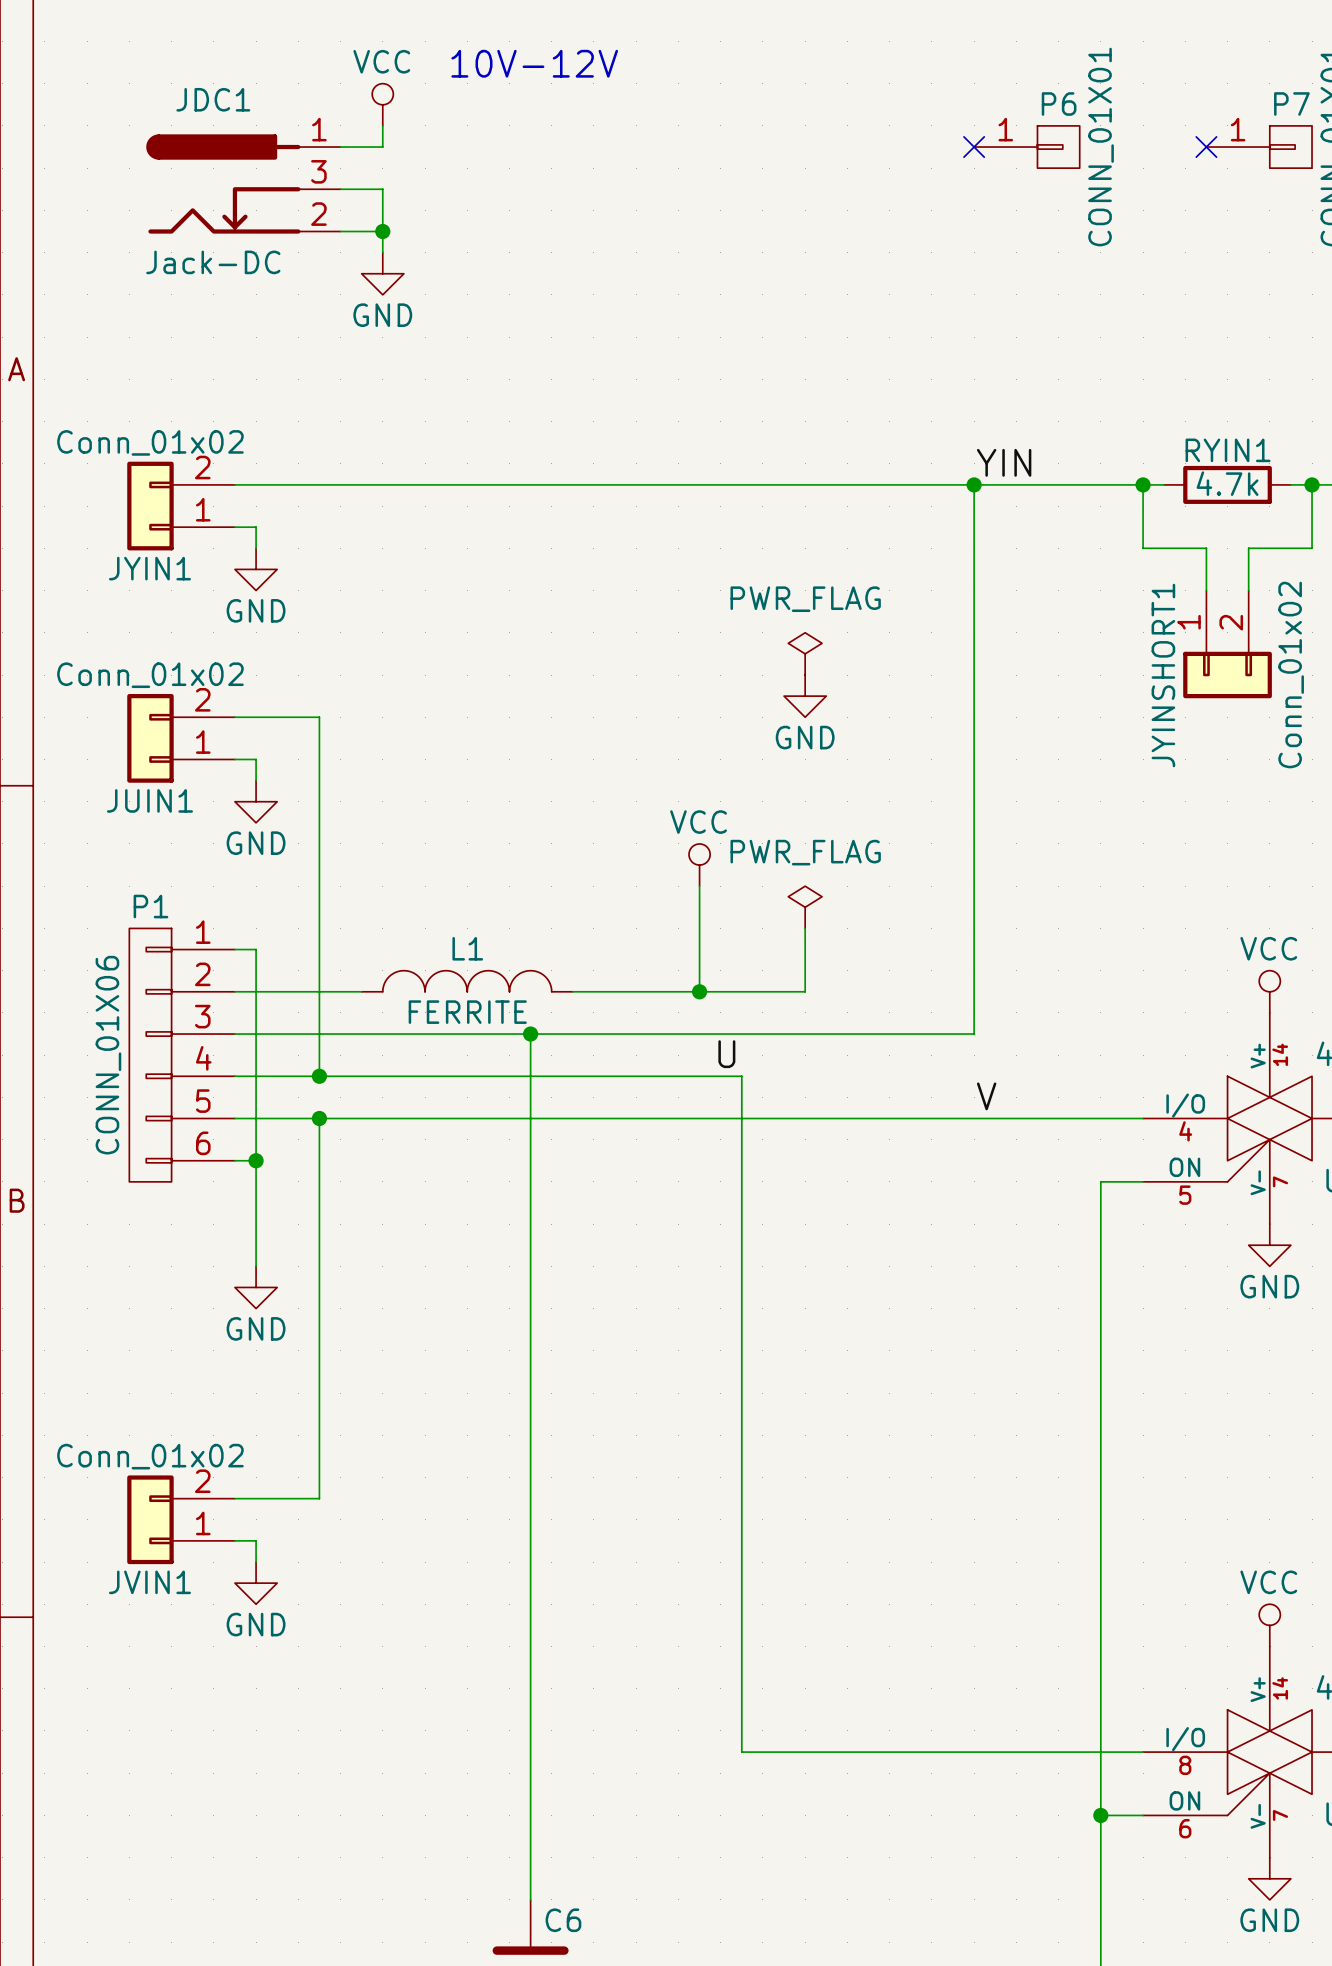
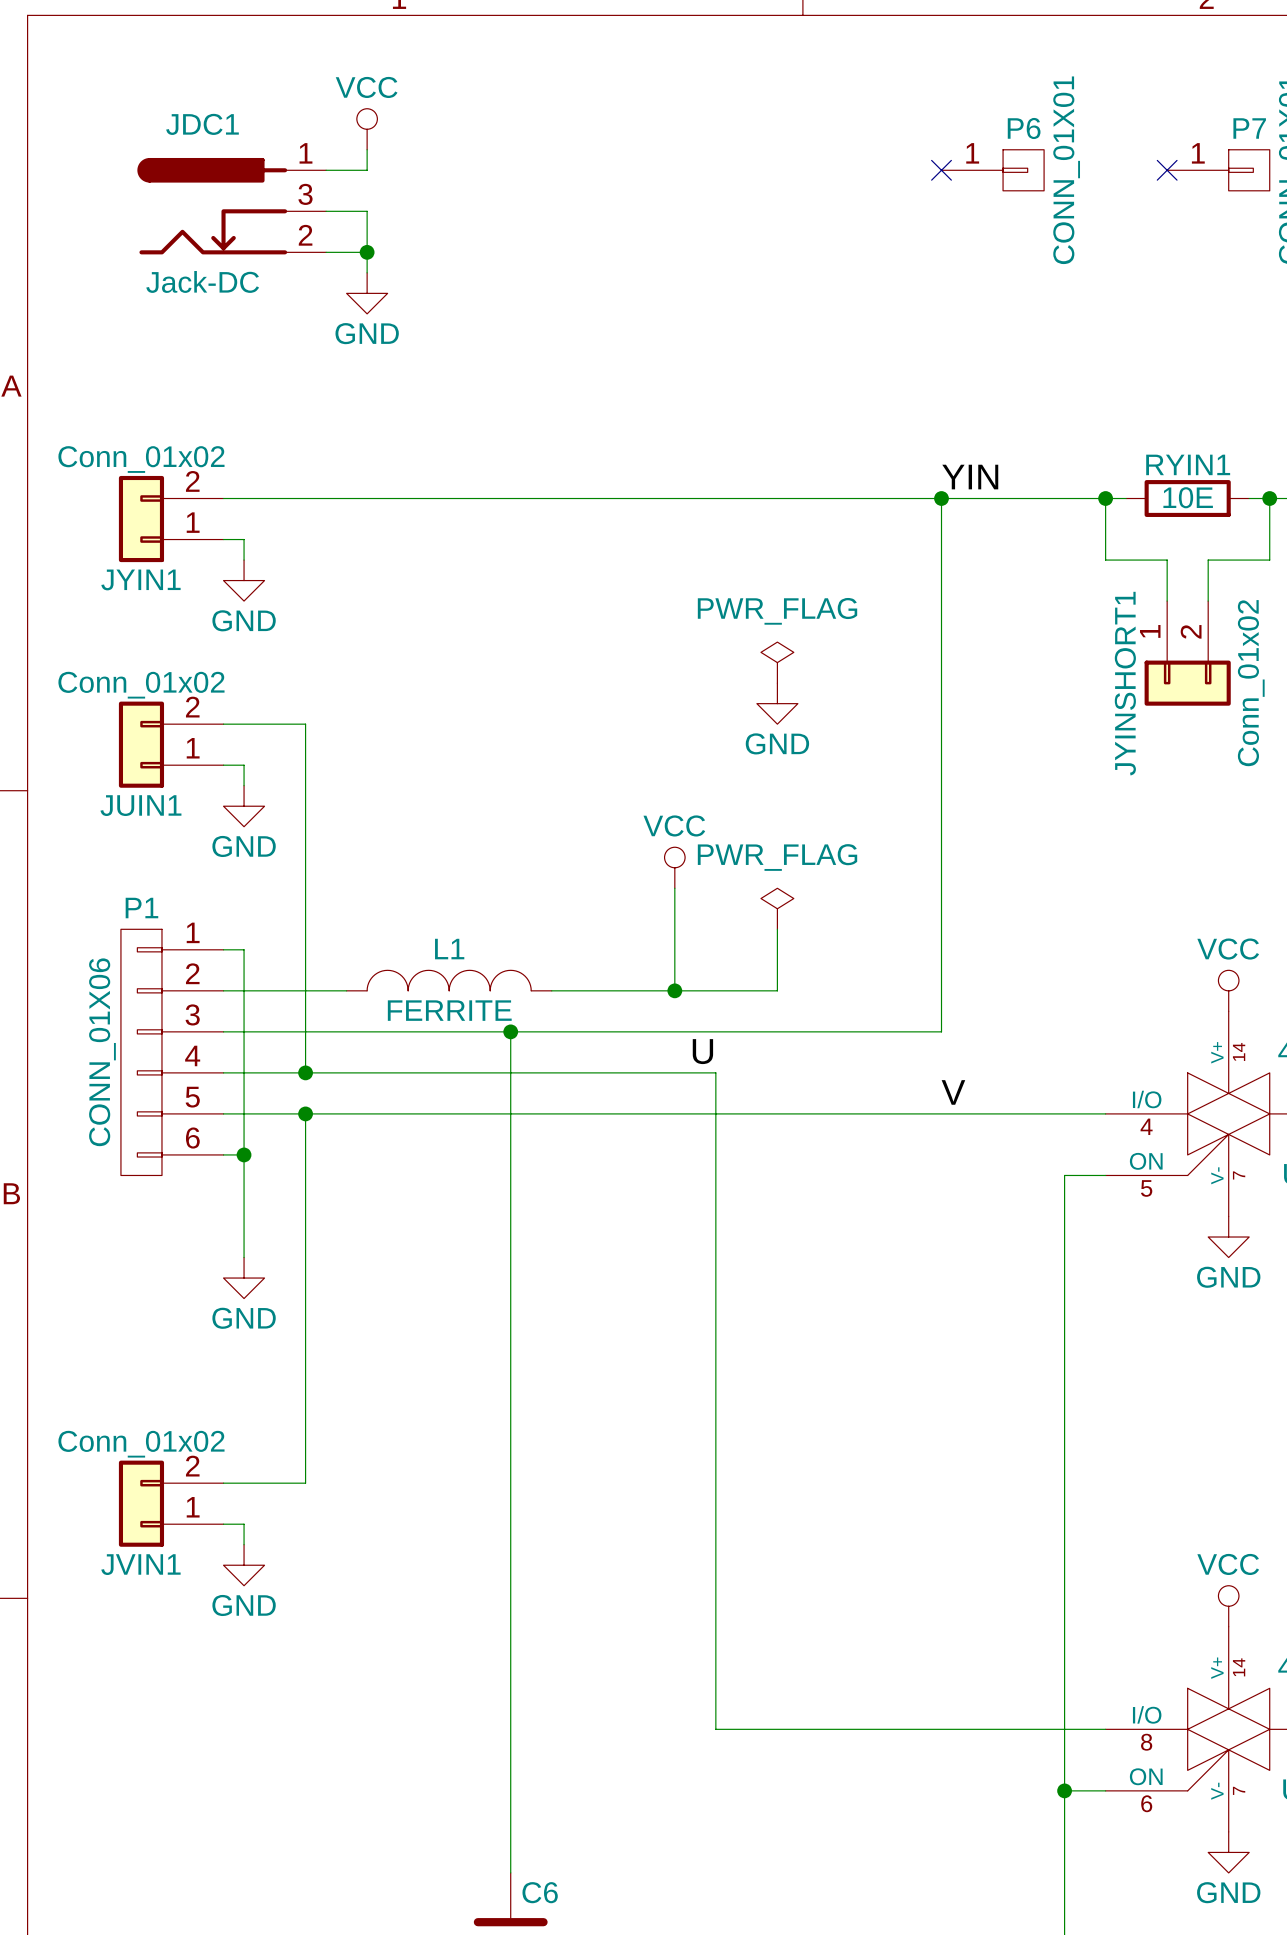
text: 10V-12V (534, 63) -> none
RYIN1 value: 4.7k (1227, 483) -> 10E (1188, 497)

